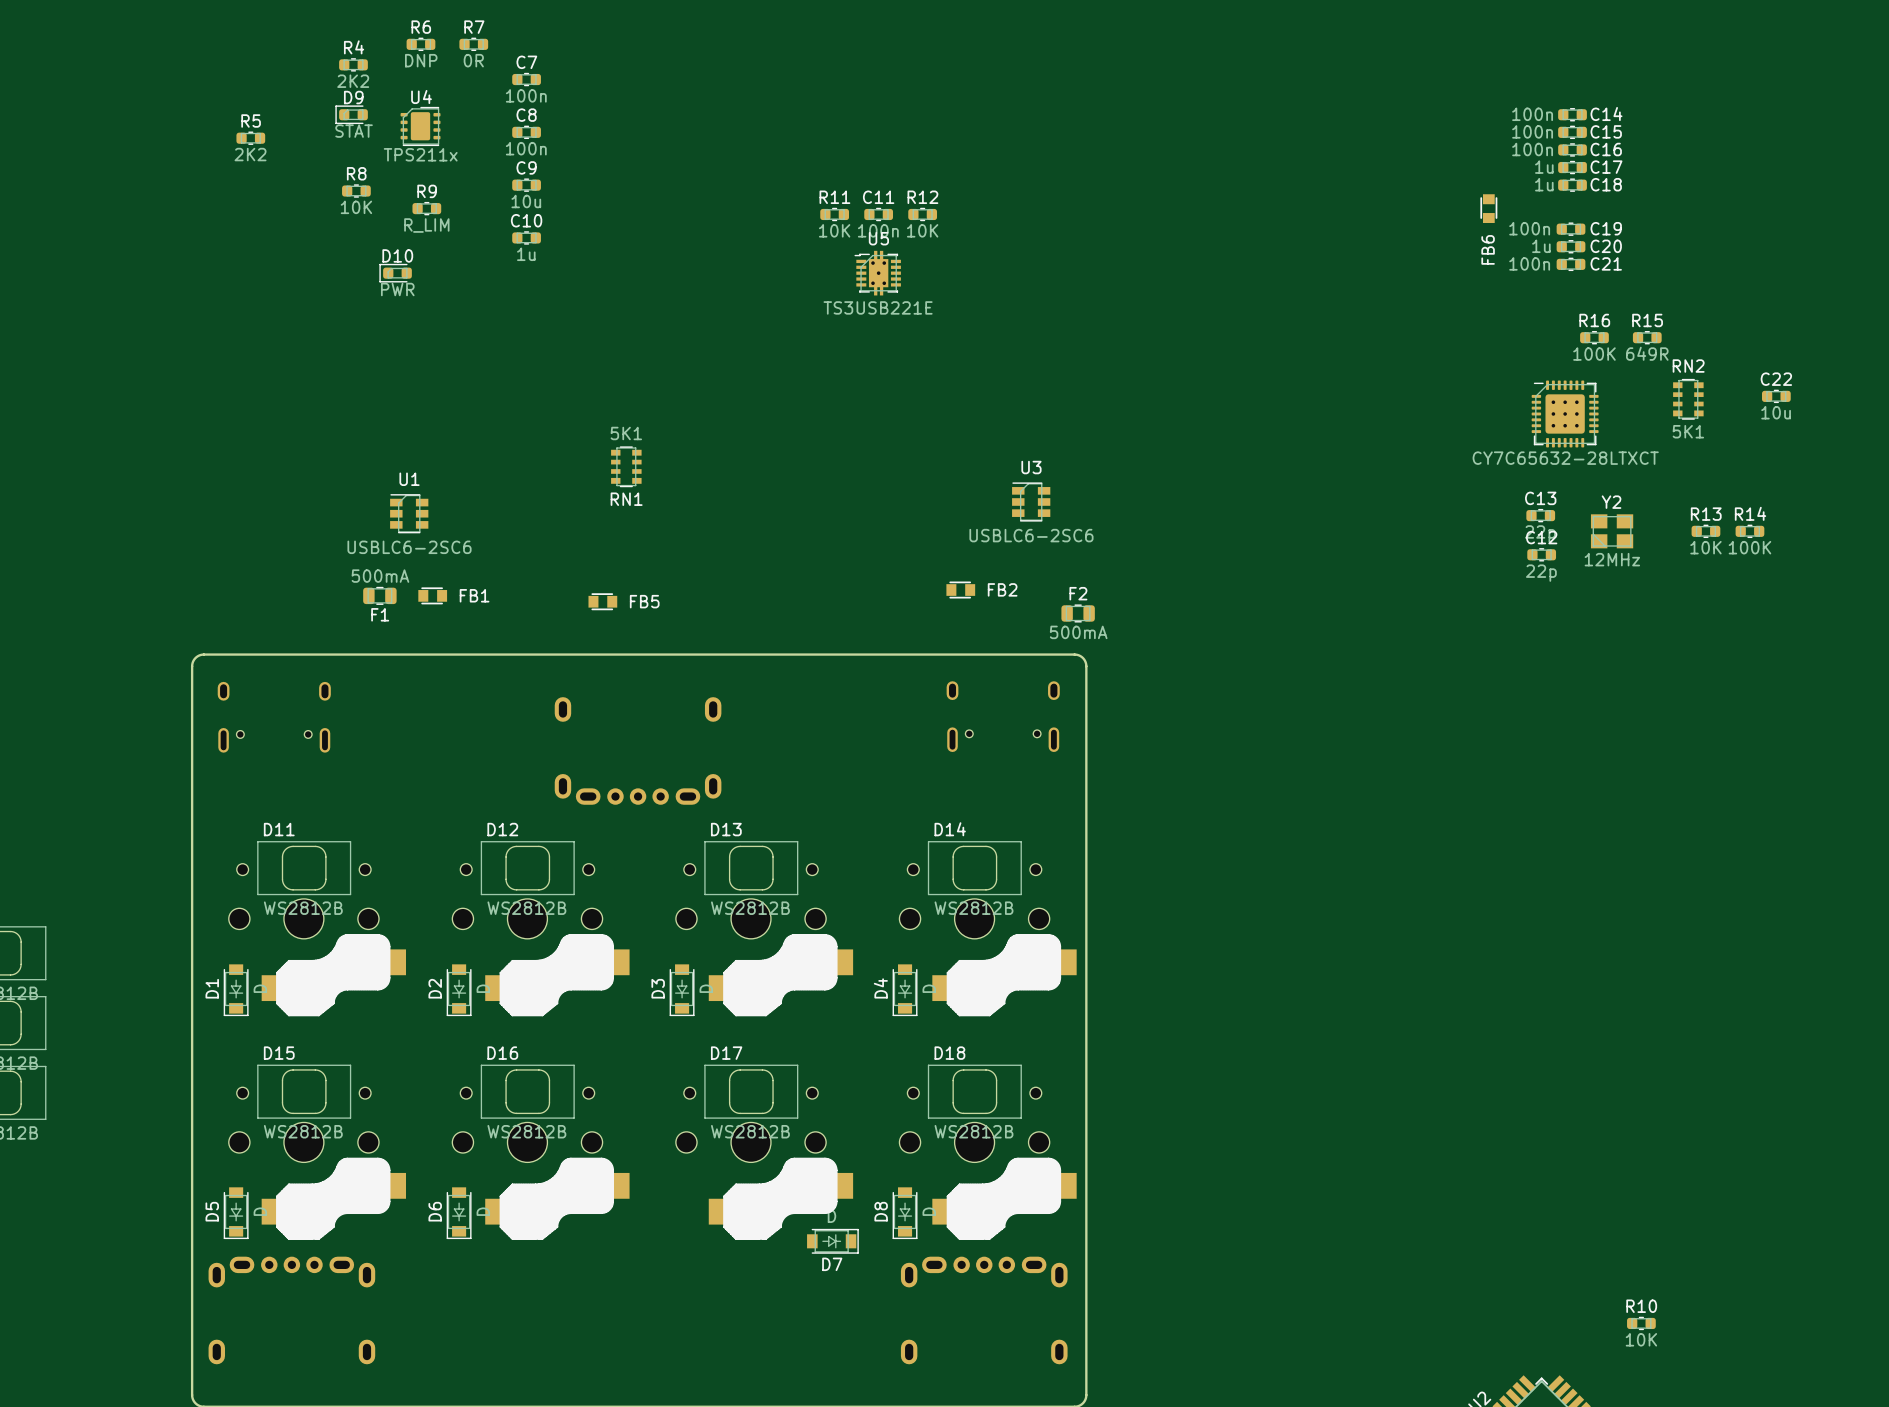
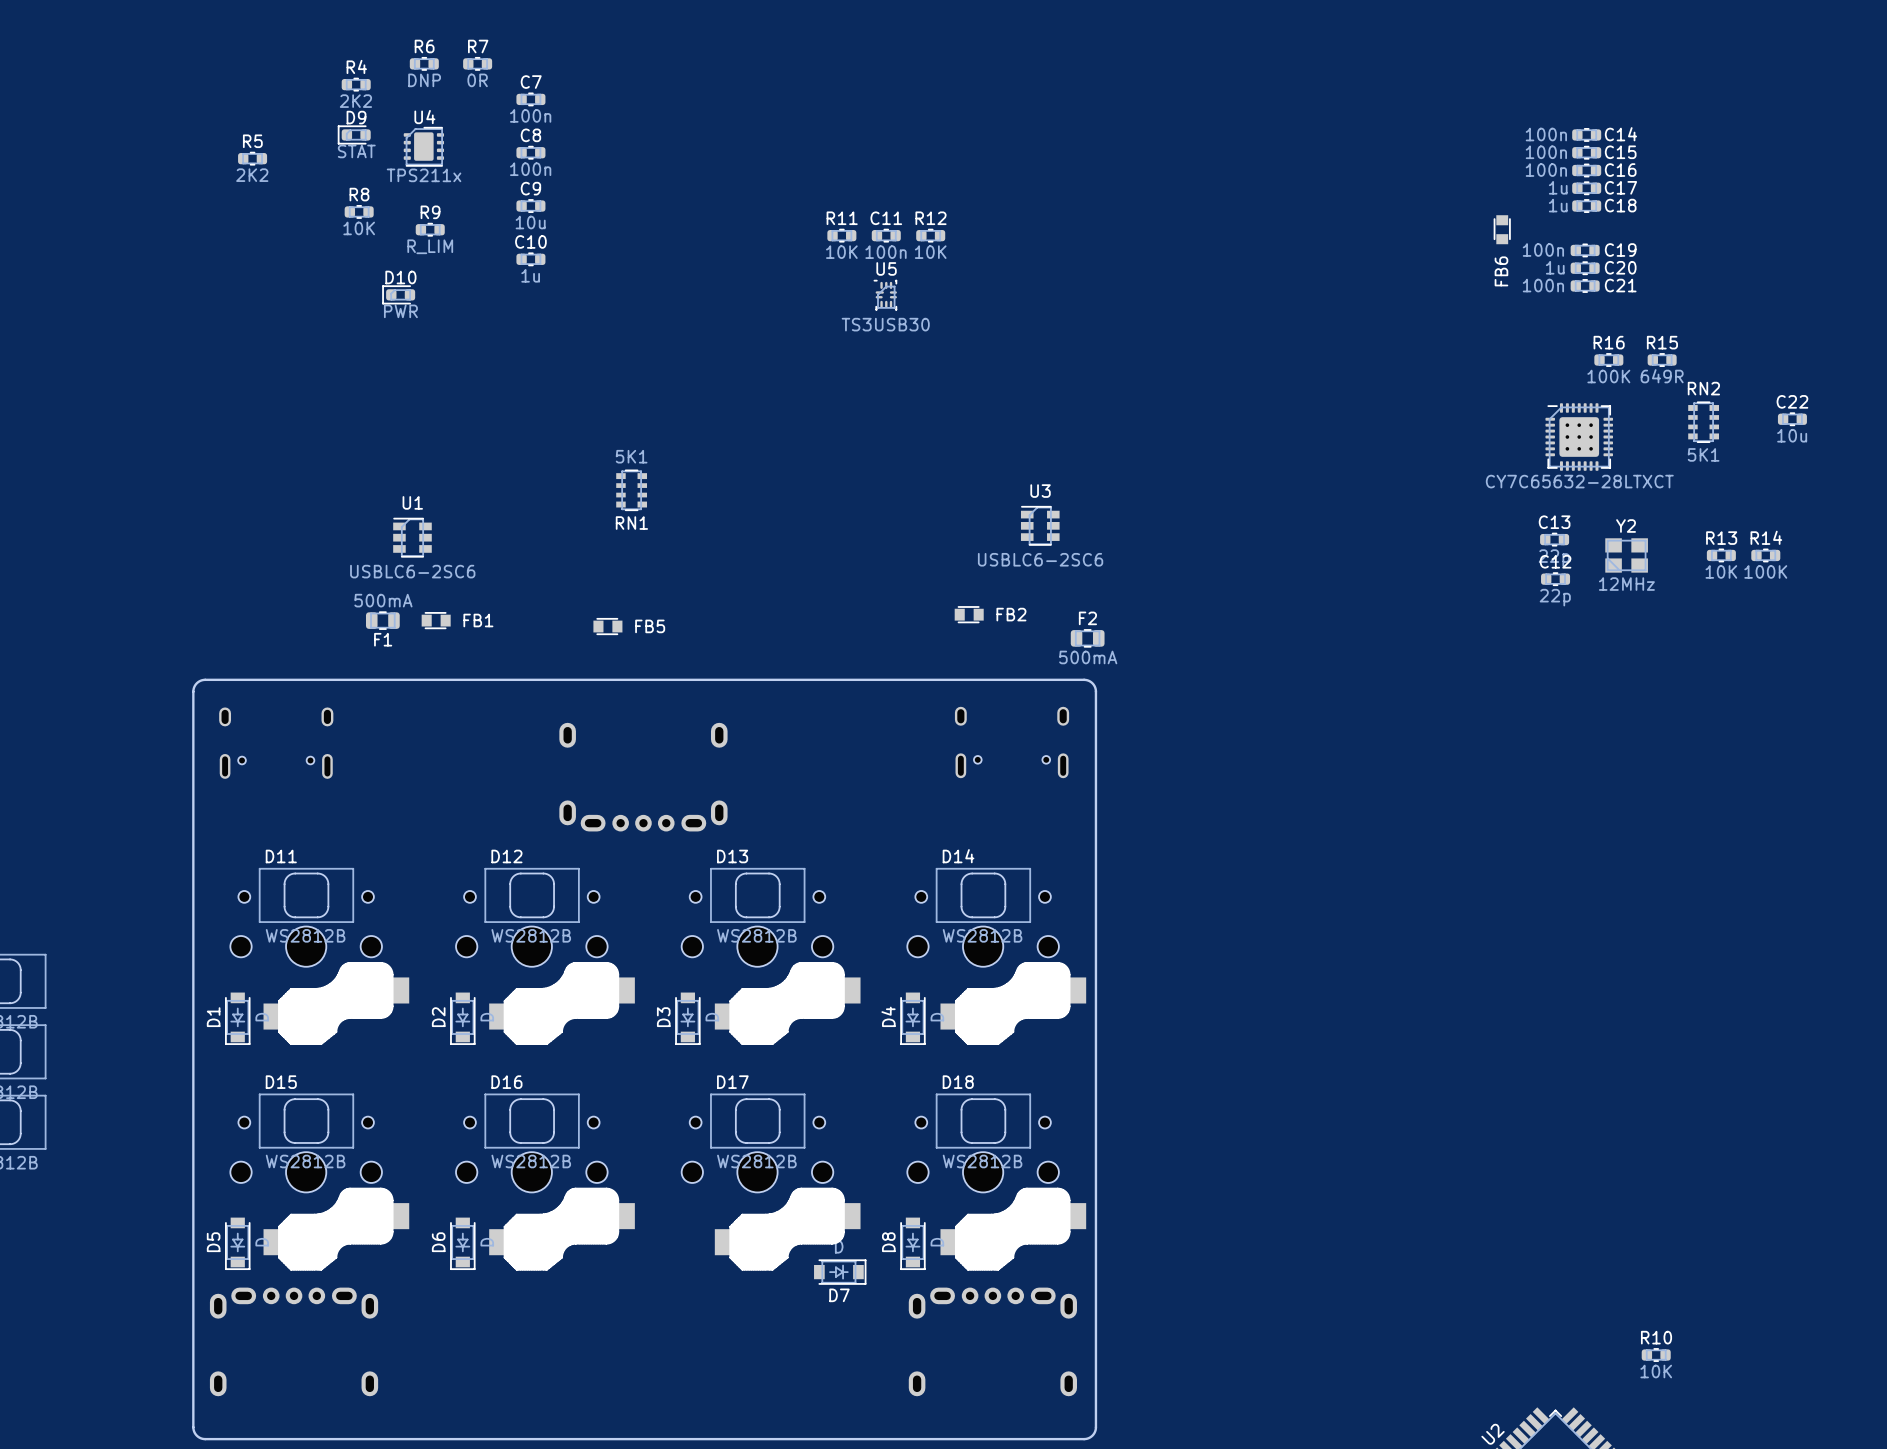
U5 footprint: [854, 250, 901, 296] -> [873, 279, 898, 311]
U5 value: TS3USB221E (878, 307) -> TS3USB30 (885, 324)

